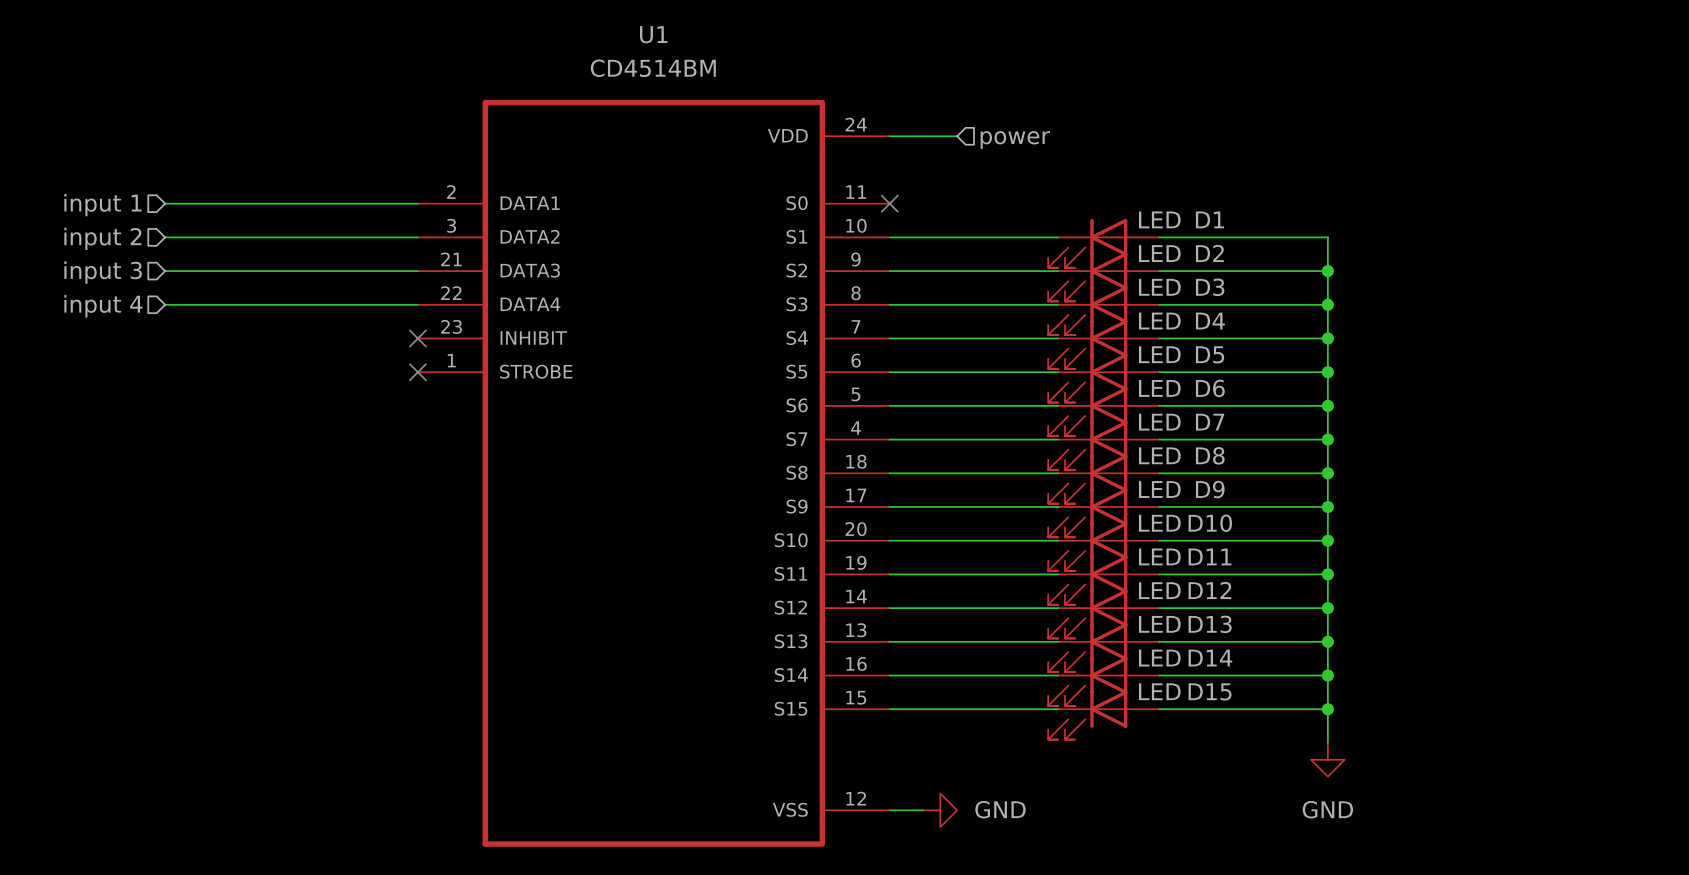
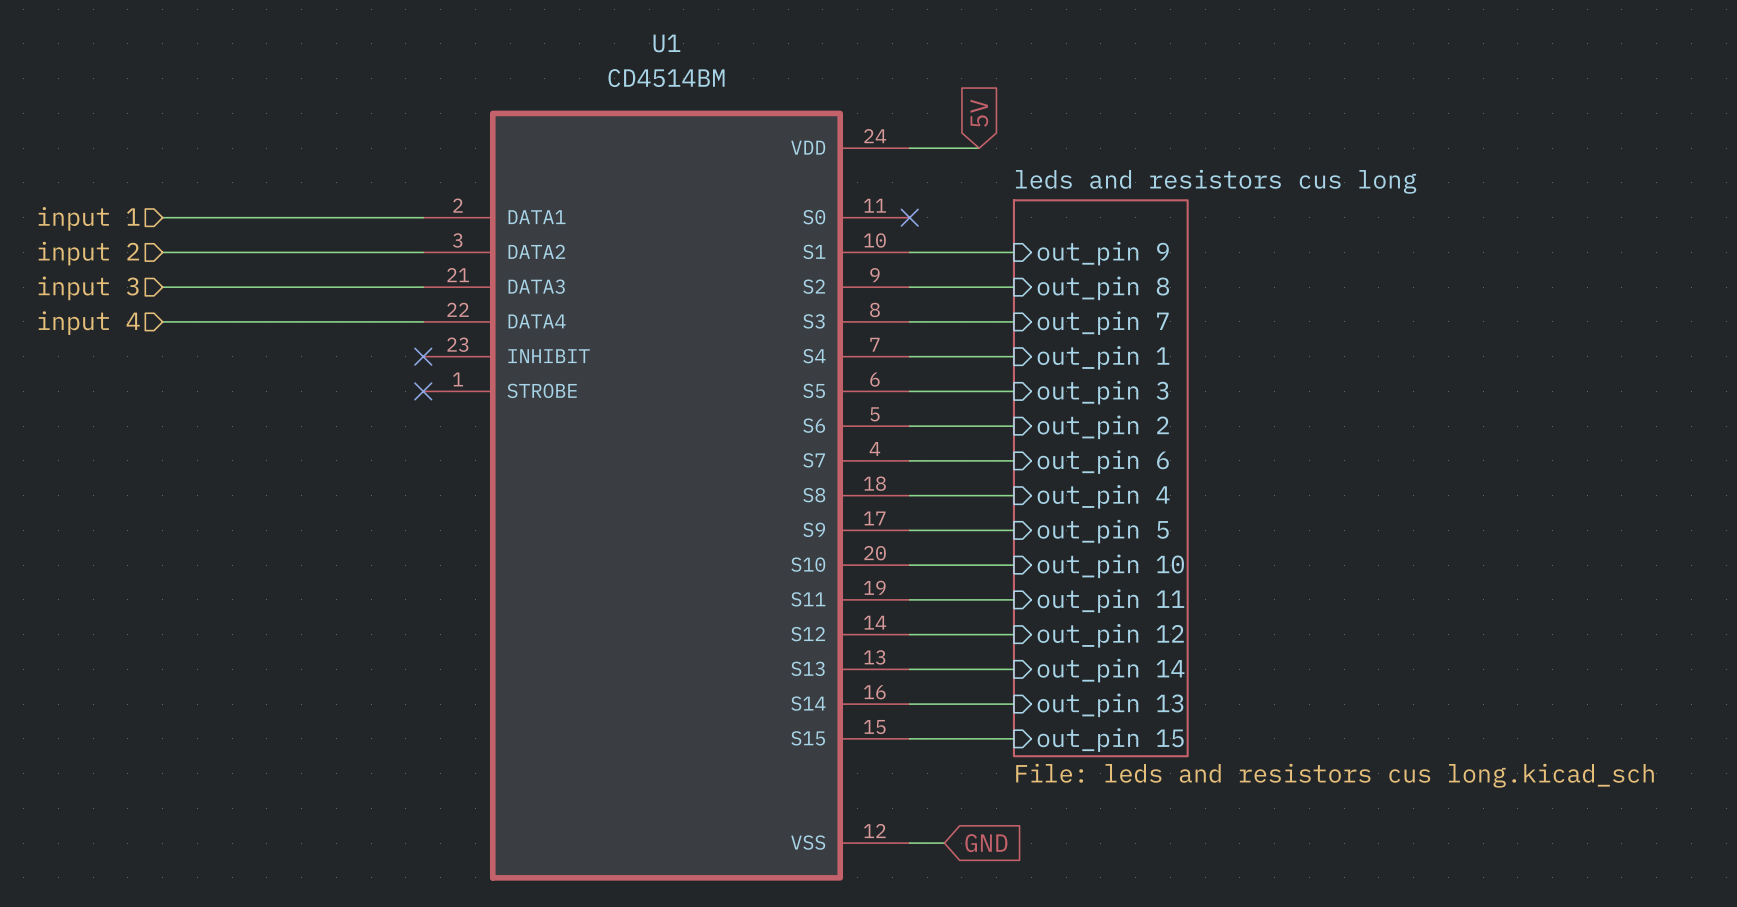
global label: none -> 5V (979, 113)
hierarchical label: power (1015, 140) -> none
wire: (990, 237) (1058, 237) -> none
wire: (1159, 237) (1327, 237) (1327, 742) -> none
sheet pin: none -> out_pin 9 (1103, 253)
D1: LED (1103, 243) -> none
wire: (990, 271) (1058, 271) -> none
wire: (1159, 271) (1327, 271) -> none
junction: (1327, 271) -> none
sheet pin: none -> out_pin 8 (1103, 288)
D2: LED (1103, 276) -> none
wire: (990, 304) (1058, 304) -> none
wire: (1159, 304) (1327, 304) -> none
junction: (1327, 304) -> none
sheet pin: none -> out_pin 7 (1103, 323)
D3: LED (1103, 310) -> none
wire: (990, 338) (1058, 338) -> none
wire: (1159, 338) (1327, 338) -> none
junction: (1327, 338) -> none
sheet pin: none -> out_pin 1 (1103, 357)
D4: LED (1103, 344) -> none
wire: (990, 372) (1058, 372) -> none
wire: (1159, 372) (1327, 372) -> none
junction: (1327, 372) -> none
sheet pin: none -> out_pin 3 (1103, 392)
D5: LED (1103, 378) -> none
wire: (990, 405) (1058, 405) -> none
wire: (1159, 405) (1327, 405) -> none
junction: (1327, 405) -> none
sheet pin: none -> out_pin 2 (1103, 427)
D6: LED (1103, 411) -> none
wire: (990, 439) (1058, 439) -> none
wire: (1159, 439) (1327, 439) -> none
junction: (1327, 439) -> none
sheet pin: none -> out_pin 6 (1103, 462)
D7: LED (1103, 445) -> none
sheet leds and resistors cus long: none -> File: leds and resistors cus long.kicad_sch (1100, 478)
wire: (990, 473) (1058, 473) -> none
wire: (1159, 473) (1327, 473) -> none
junction: (1327, 473) -> none
sheet pin: none -> out_pin 4 (1103, 496)
D8: LED (1103, 479) -> none
wire: (990, 507) (1058, 507) -> none
wire: (1159, 507) (1327, 507) -> none
junction: (1327, 507) -> none
sheet pin: none -> out_pin 5 (1103, 531)
D9: LED (1103, 512) -> none
wire: (990, 540) (1058, 540) -> none
wire: (1159, 540) (1327, 540) -> none
junction: (1327, 540) -> none
sheet pin: none -> out_pin 10 (1110, 566)
D10: LED (1103, 546) -> none
wire: (990, 574) (1058, 574) -> none
wire: (1159, 574) (1327, 574) -> none
junction: (1327, 574) -> none
sheet pin: none -> out_pin 11 (1110, 601)
D11: LED (1103, 580) -> none
wire: (990, 608) (1058, 608) -> none
wire: (1159, 608) (1327, 608) -> none
junction: (1327, 608) -> none
sheet pin: none -> out_pin 12 (1110, 635)
D12: LED (1103, 614) -> none
wire: (990, 641) (1058, 641) -> none
wire: (1159, 641) (1327, 641) -> none
junction: (1327, 641) -> none
sheet pin: none -> out_pin 14 (1111, 670)
D13: LED (1103, 647) -> none
wire: (990, 675) (1058, 675) -> none
wire: (1159, 675) (1327, 675) -> none
junction: (1327, 675) -> none
sheet pin: none -> out_pin 13 (1110, 705)
D14: LED (1103, 681) -> none
wire: (990, 709) (1058, 709) -> none
wire: (1159, 709) (1327, 709) -> none
junction: (1327, 709) -> none
sheet pin: none -> out_pin 15 (1110, 740)
D15: LED (1103, 715) -> none
power symbol: GND (1327, 759) -> none
power symbol: GND (940, 810) -> none
global label: none -> GND (986, 843)

